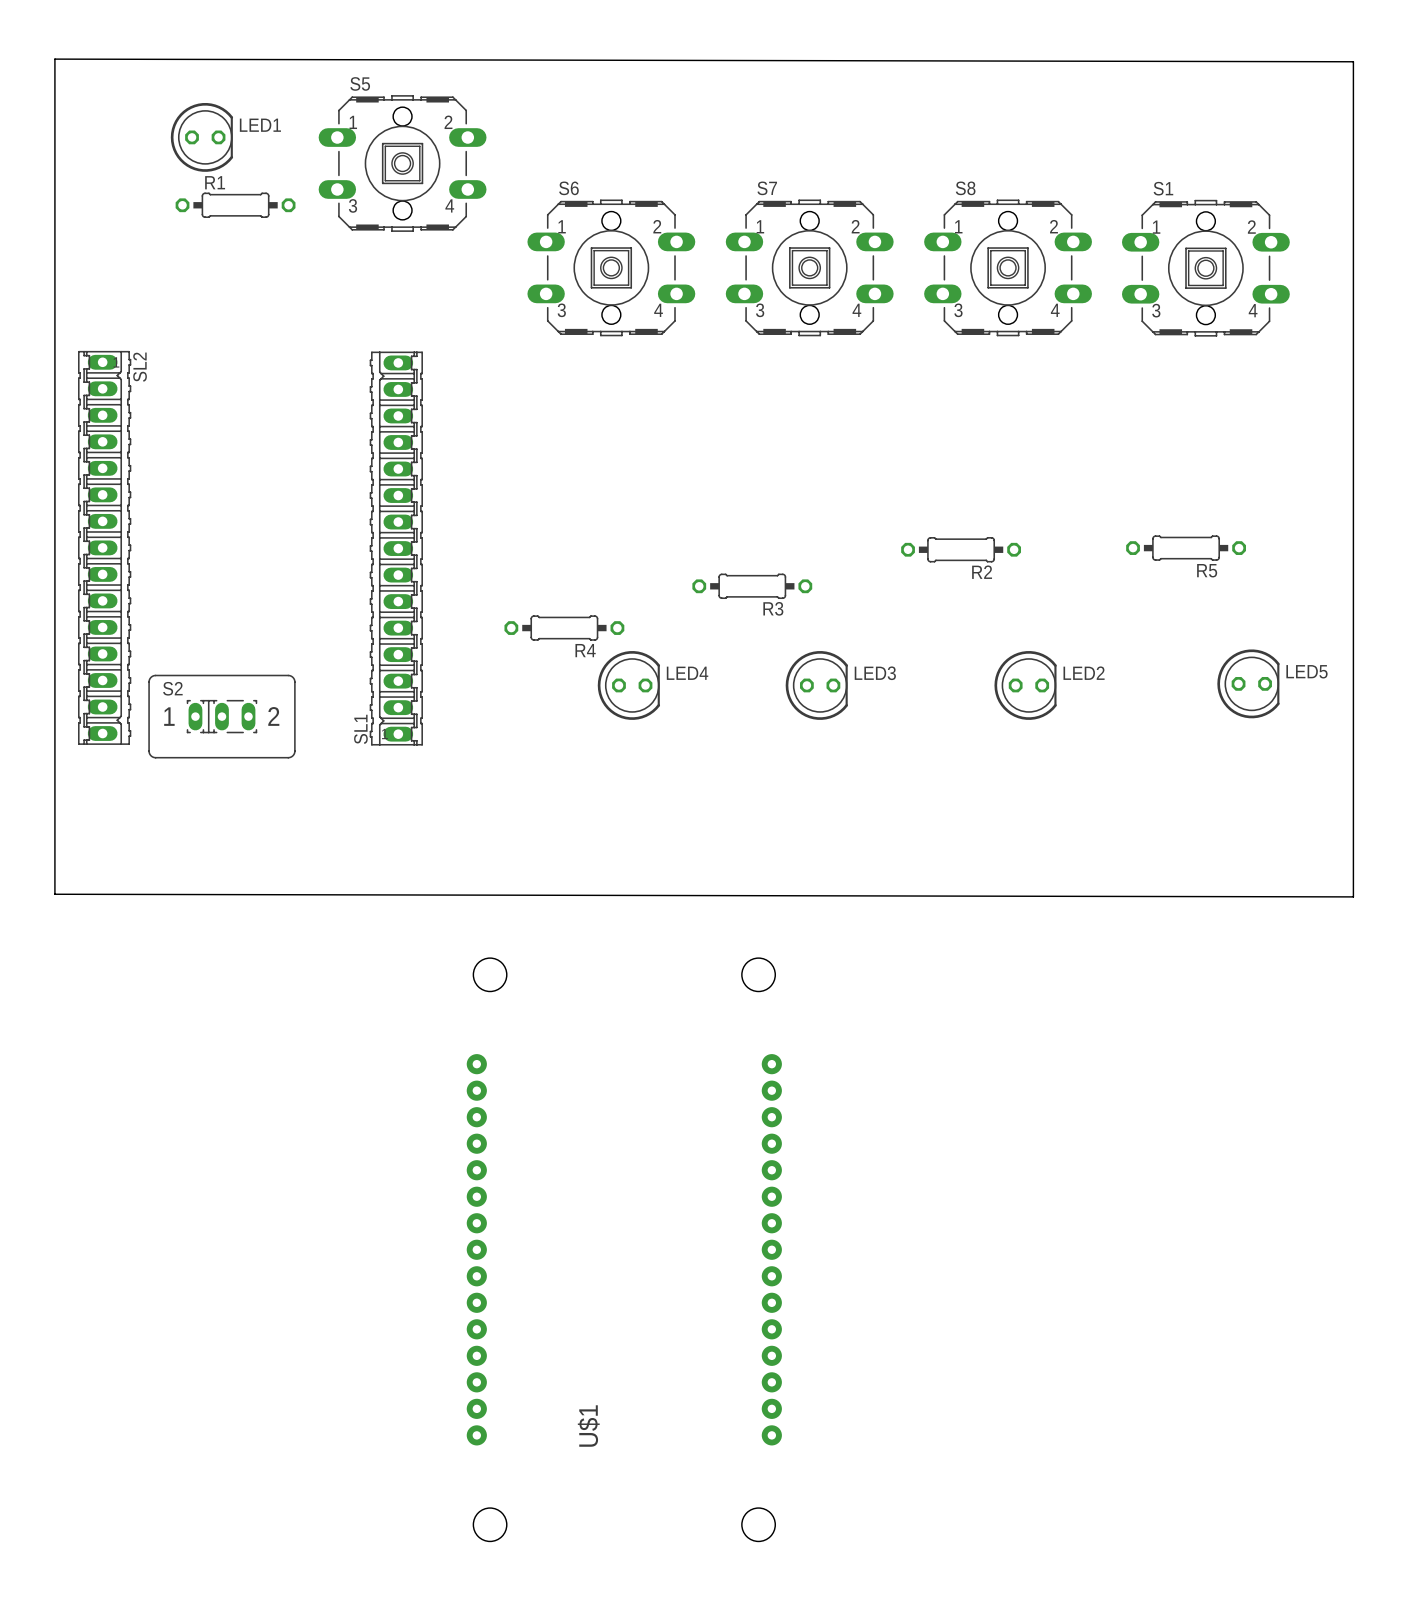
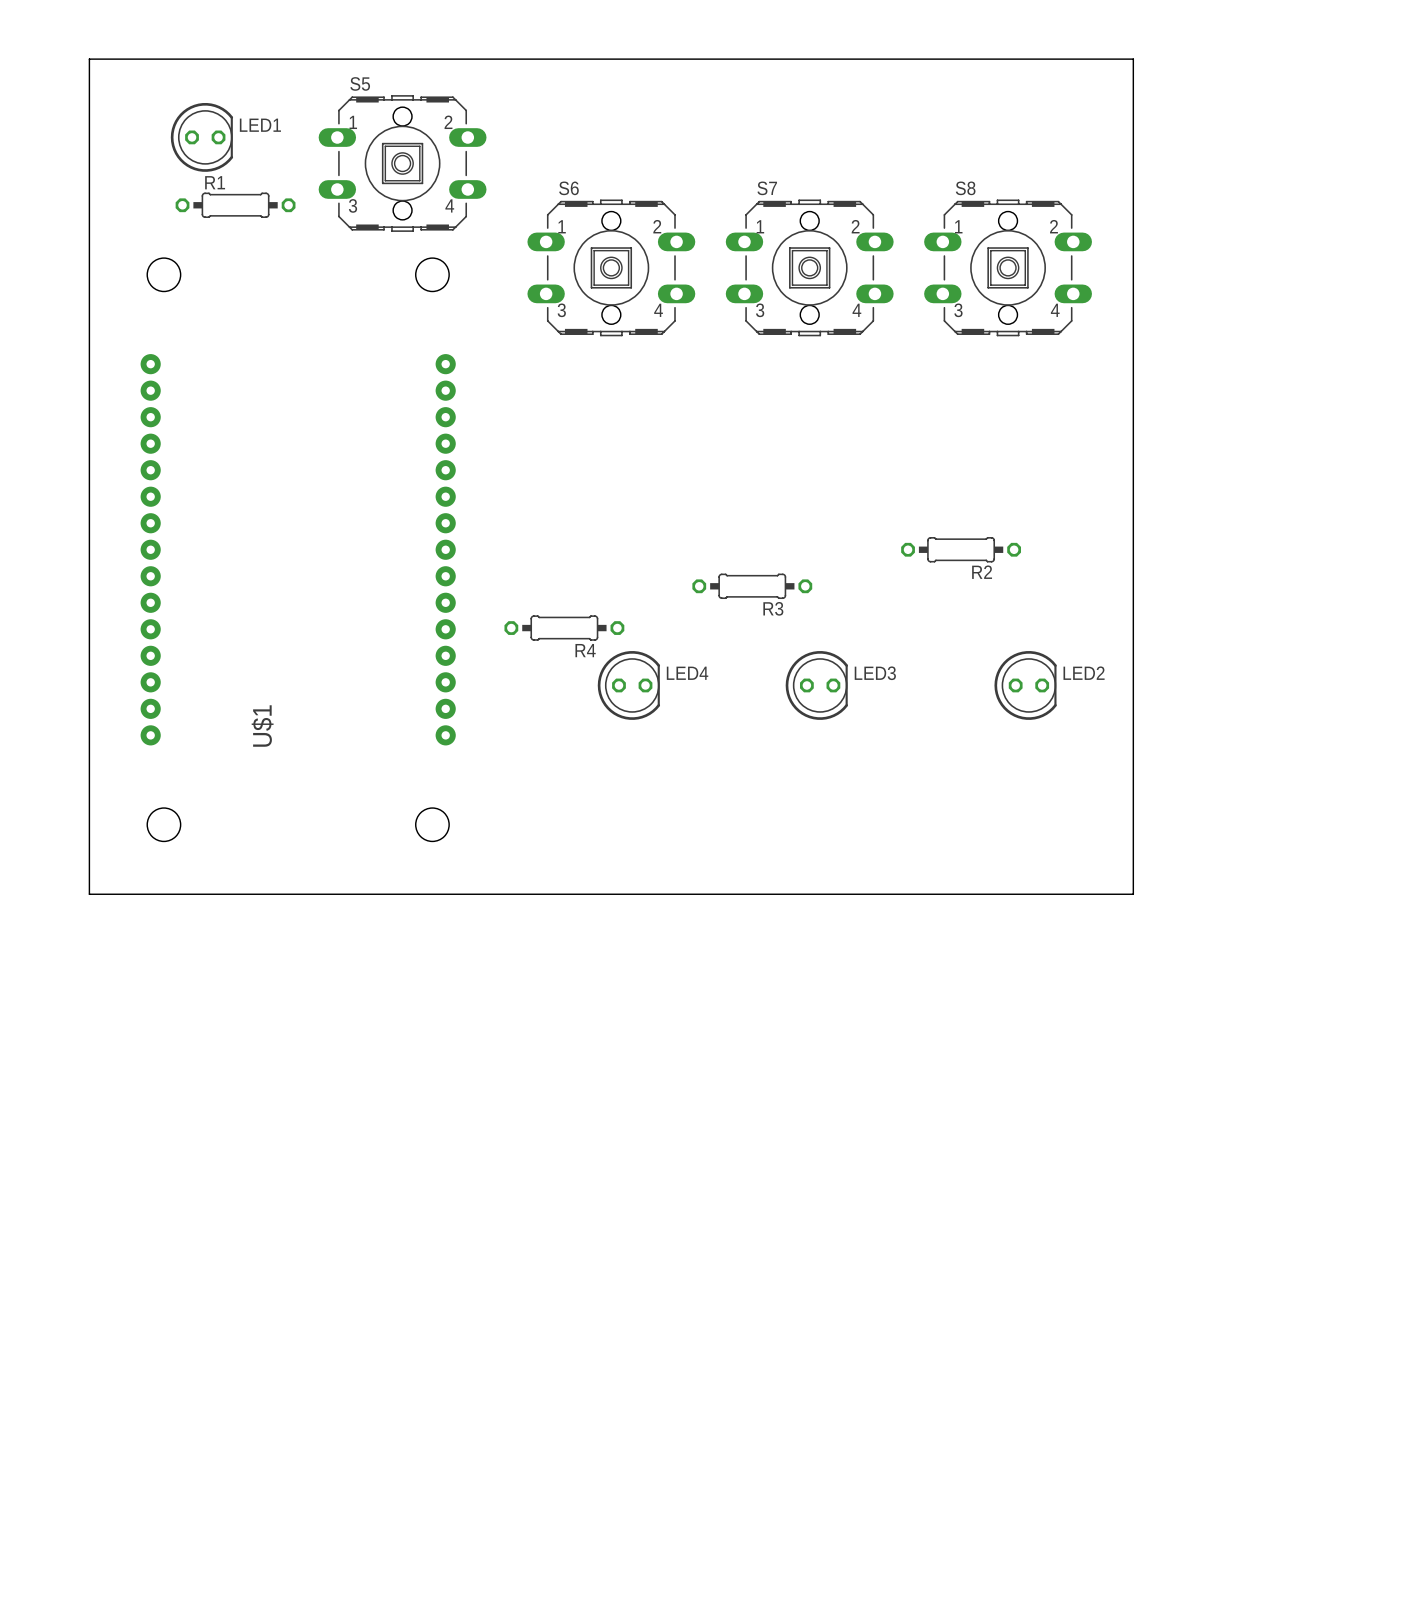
board edge: (54, 59) (1353, 61) (1353, 896) (54, 894) (54, 59) -> (89, 59) (89, 894) (1133, 894) (1133, 59) (89, 59)
S1: (1205, 268) -> none
SL2: (104, 547) -> none
SL1: (396, 548) -> none
R5: (1186, 548) -> none
LED5: (1248, 683) -> none
S2: (221, 716) -> none
U$1 position: (624, 1249) -> (298, 549)

